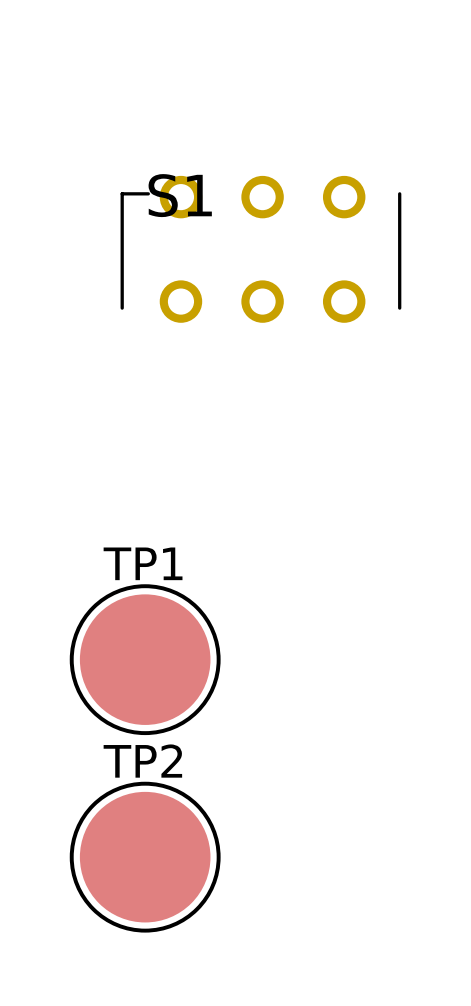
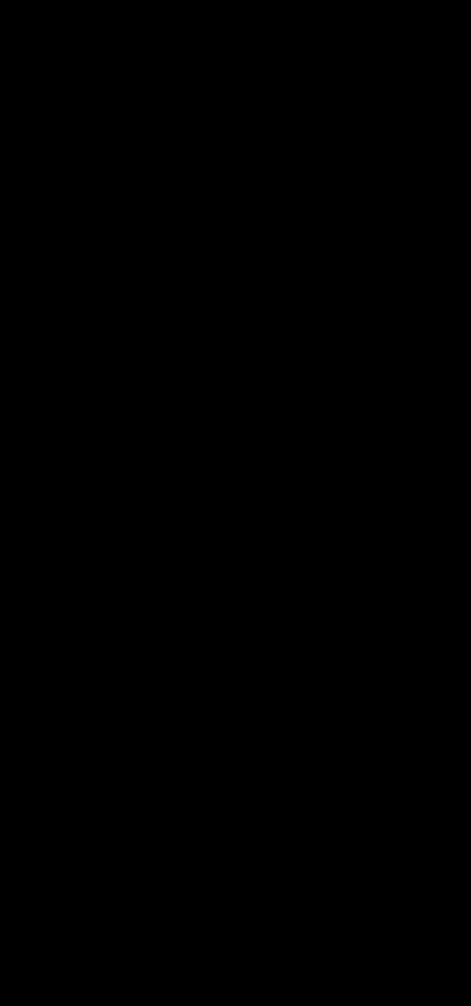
S1: (260, 249) -> none
TP1: (145, 659) -> none
TP2: (145, 857) -> none

